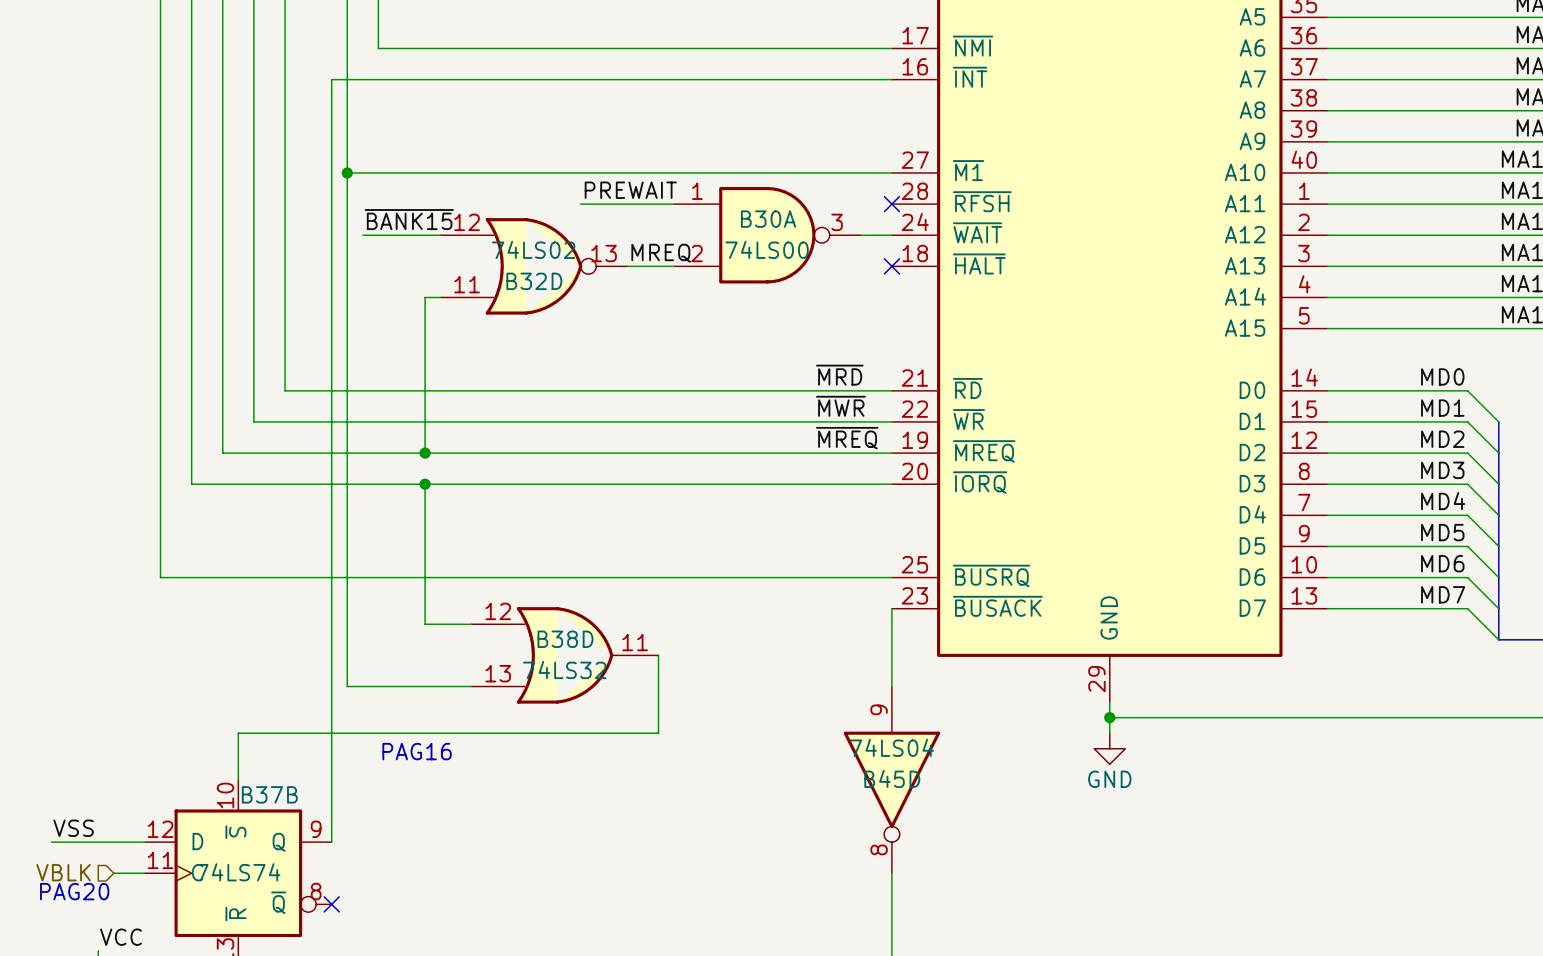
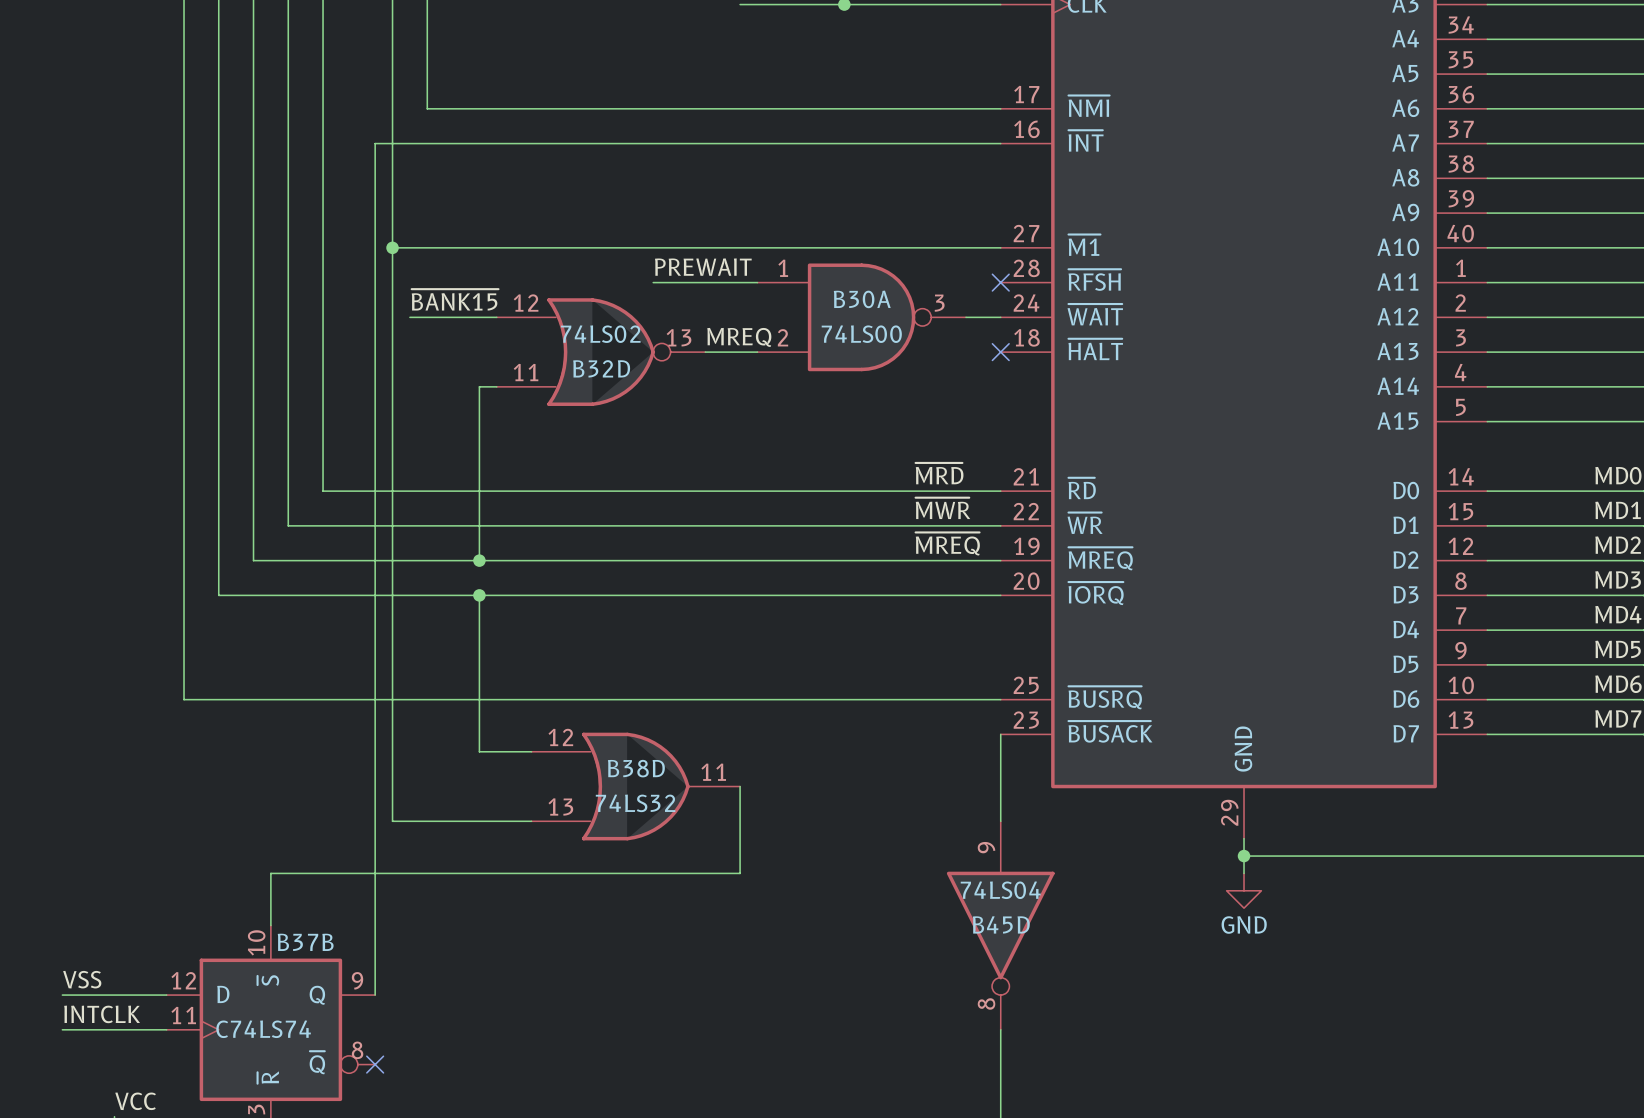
text: PAG16 (417, 751) -> none
label: none -> INTCLK (102, 1014)
hierarchical label: VBLK (63, 872) -> none
wire: none -> (62, 1029) (131, 1029)
text: PAG20 (74, 891) -> none

